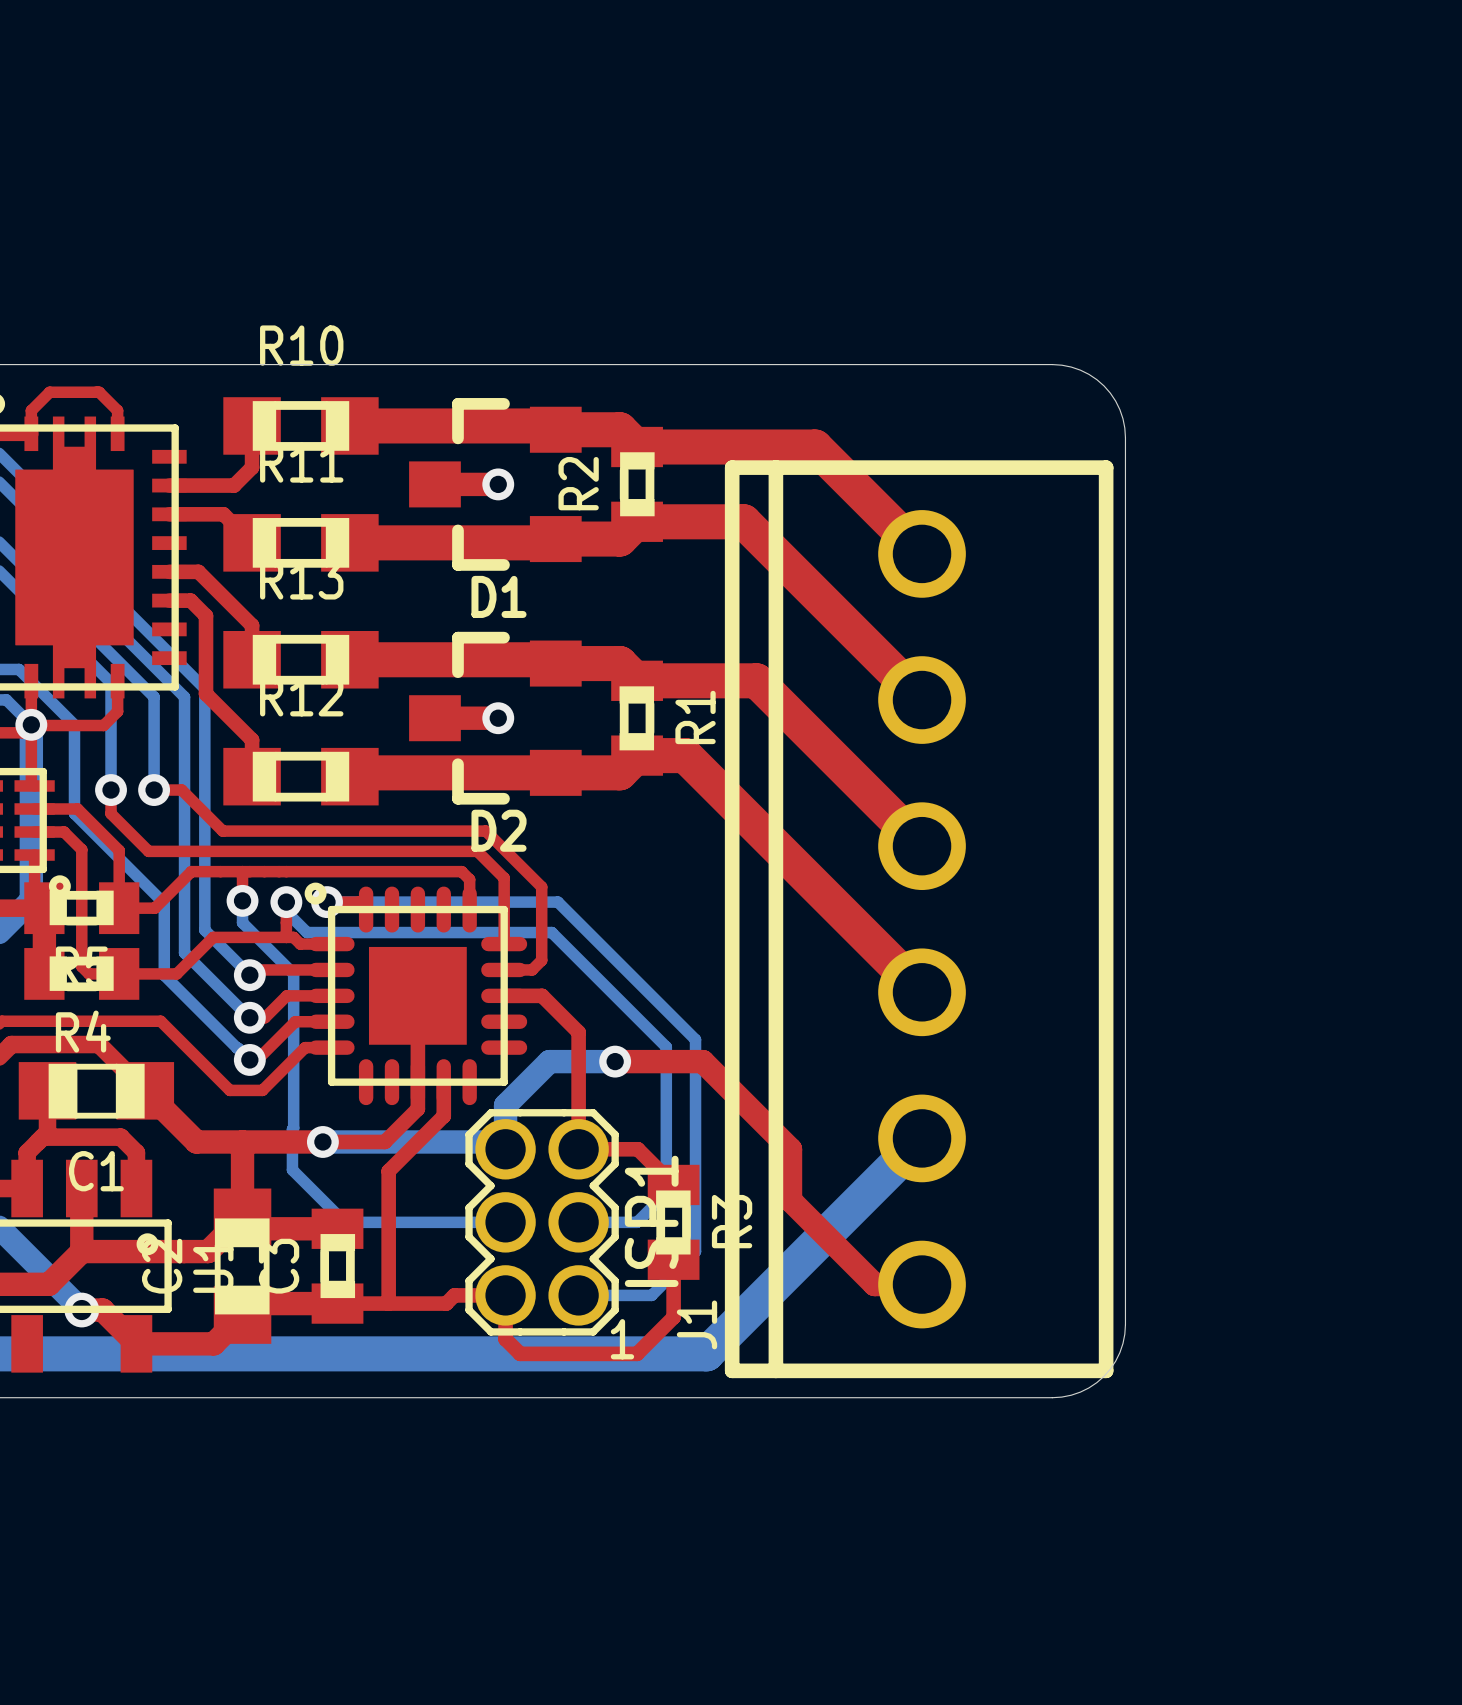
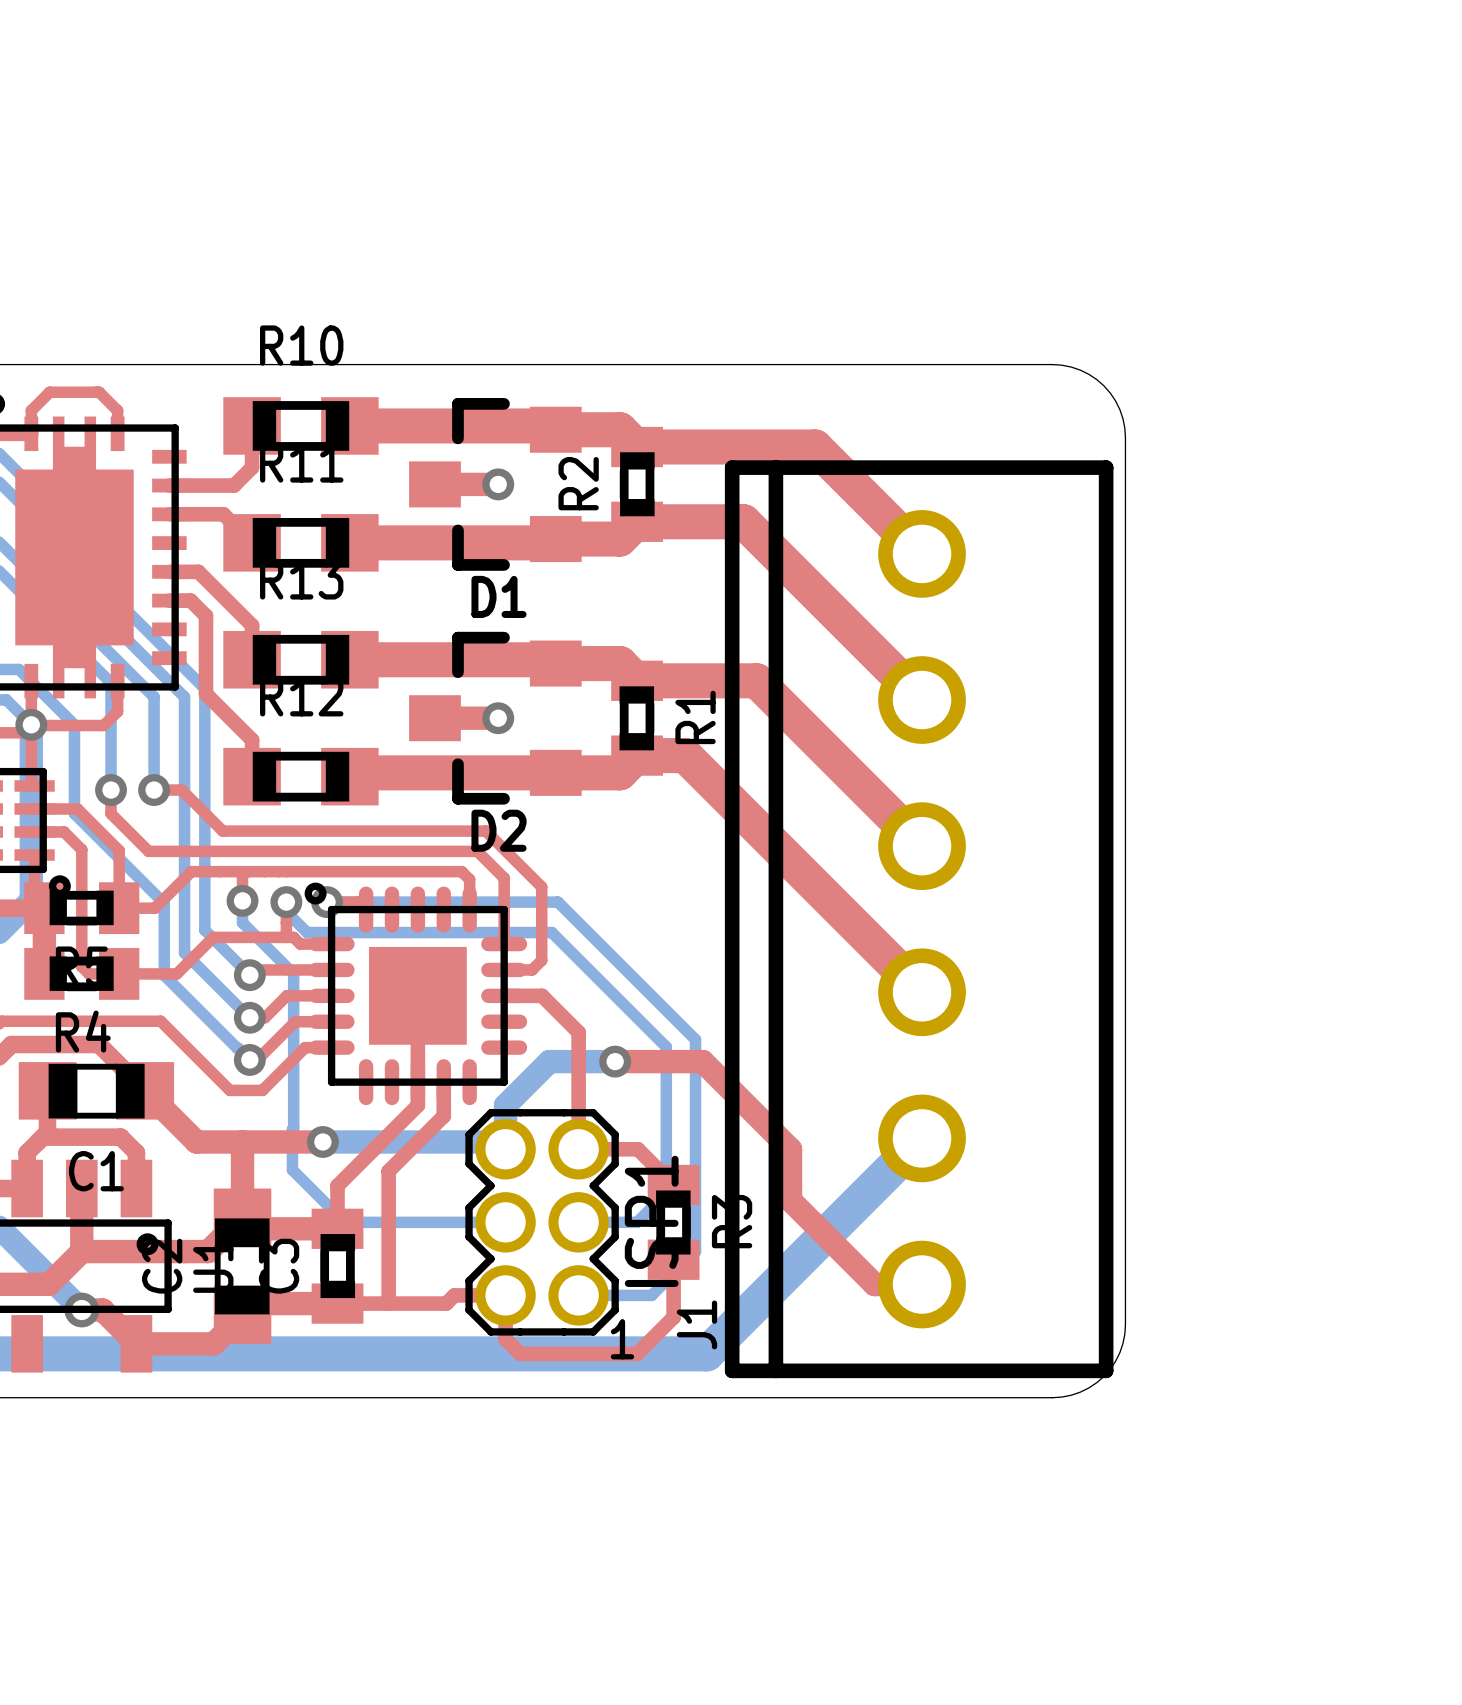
top track: (417, 1105) (417, 1108) (384, 1141) (322, 1141) -> (417, 1105) (337, 1185) (337, 1228)

